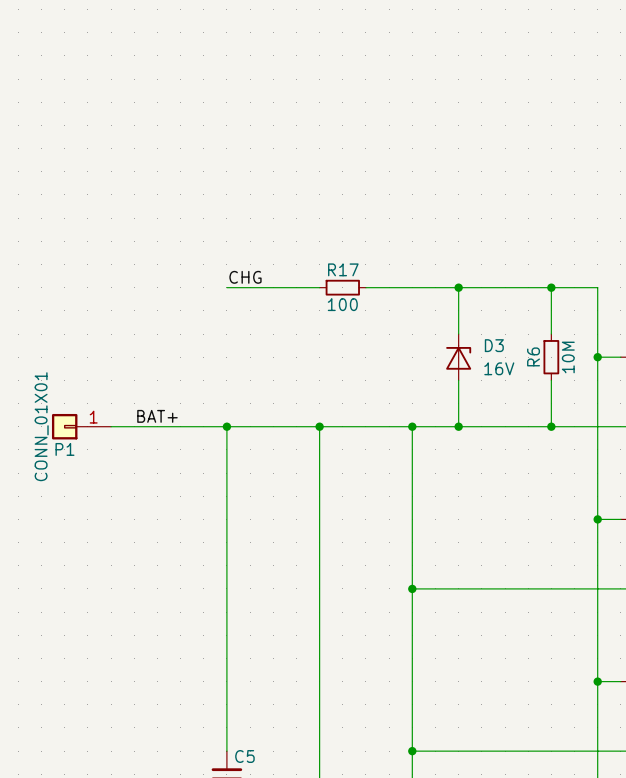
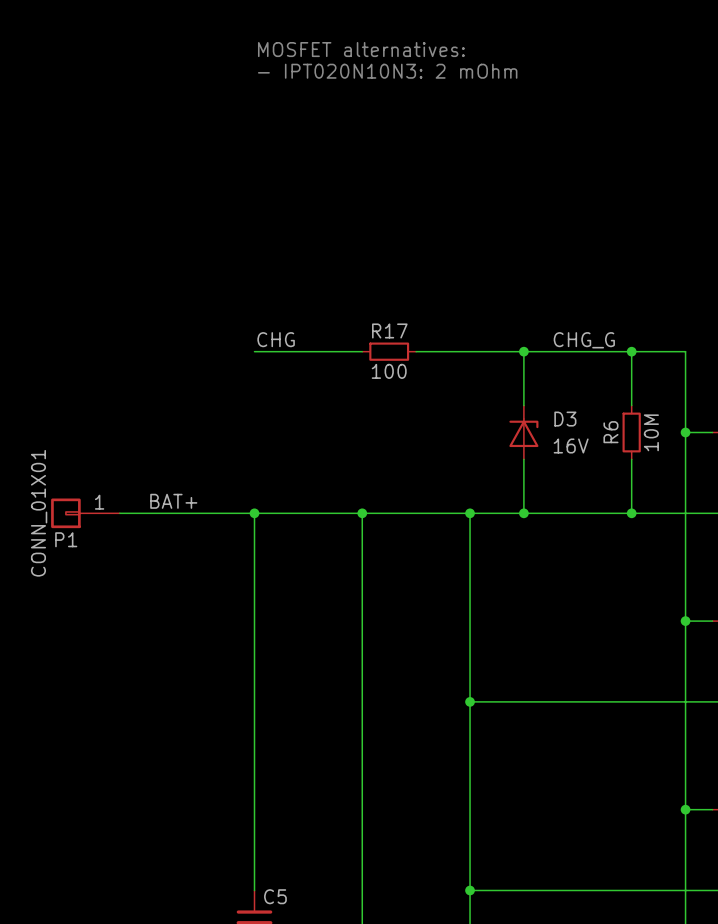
text: none -> MOSFET alternatives: (361, 49)
text: none -> - IPT020N10N3: 2 mOhm (387, 71)
label: none -> CHG_G (584, 340)

